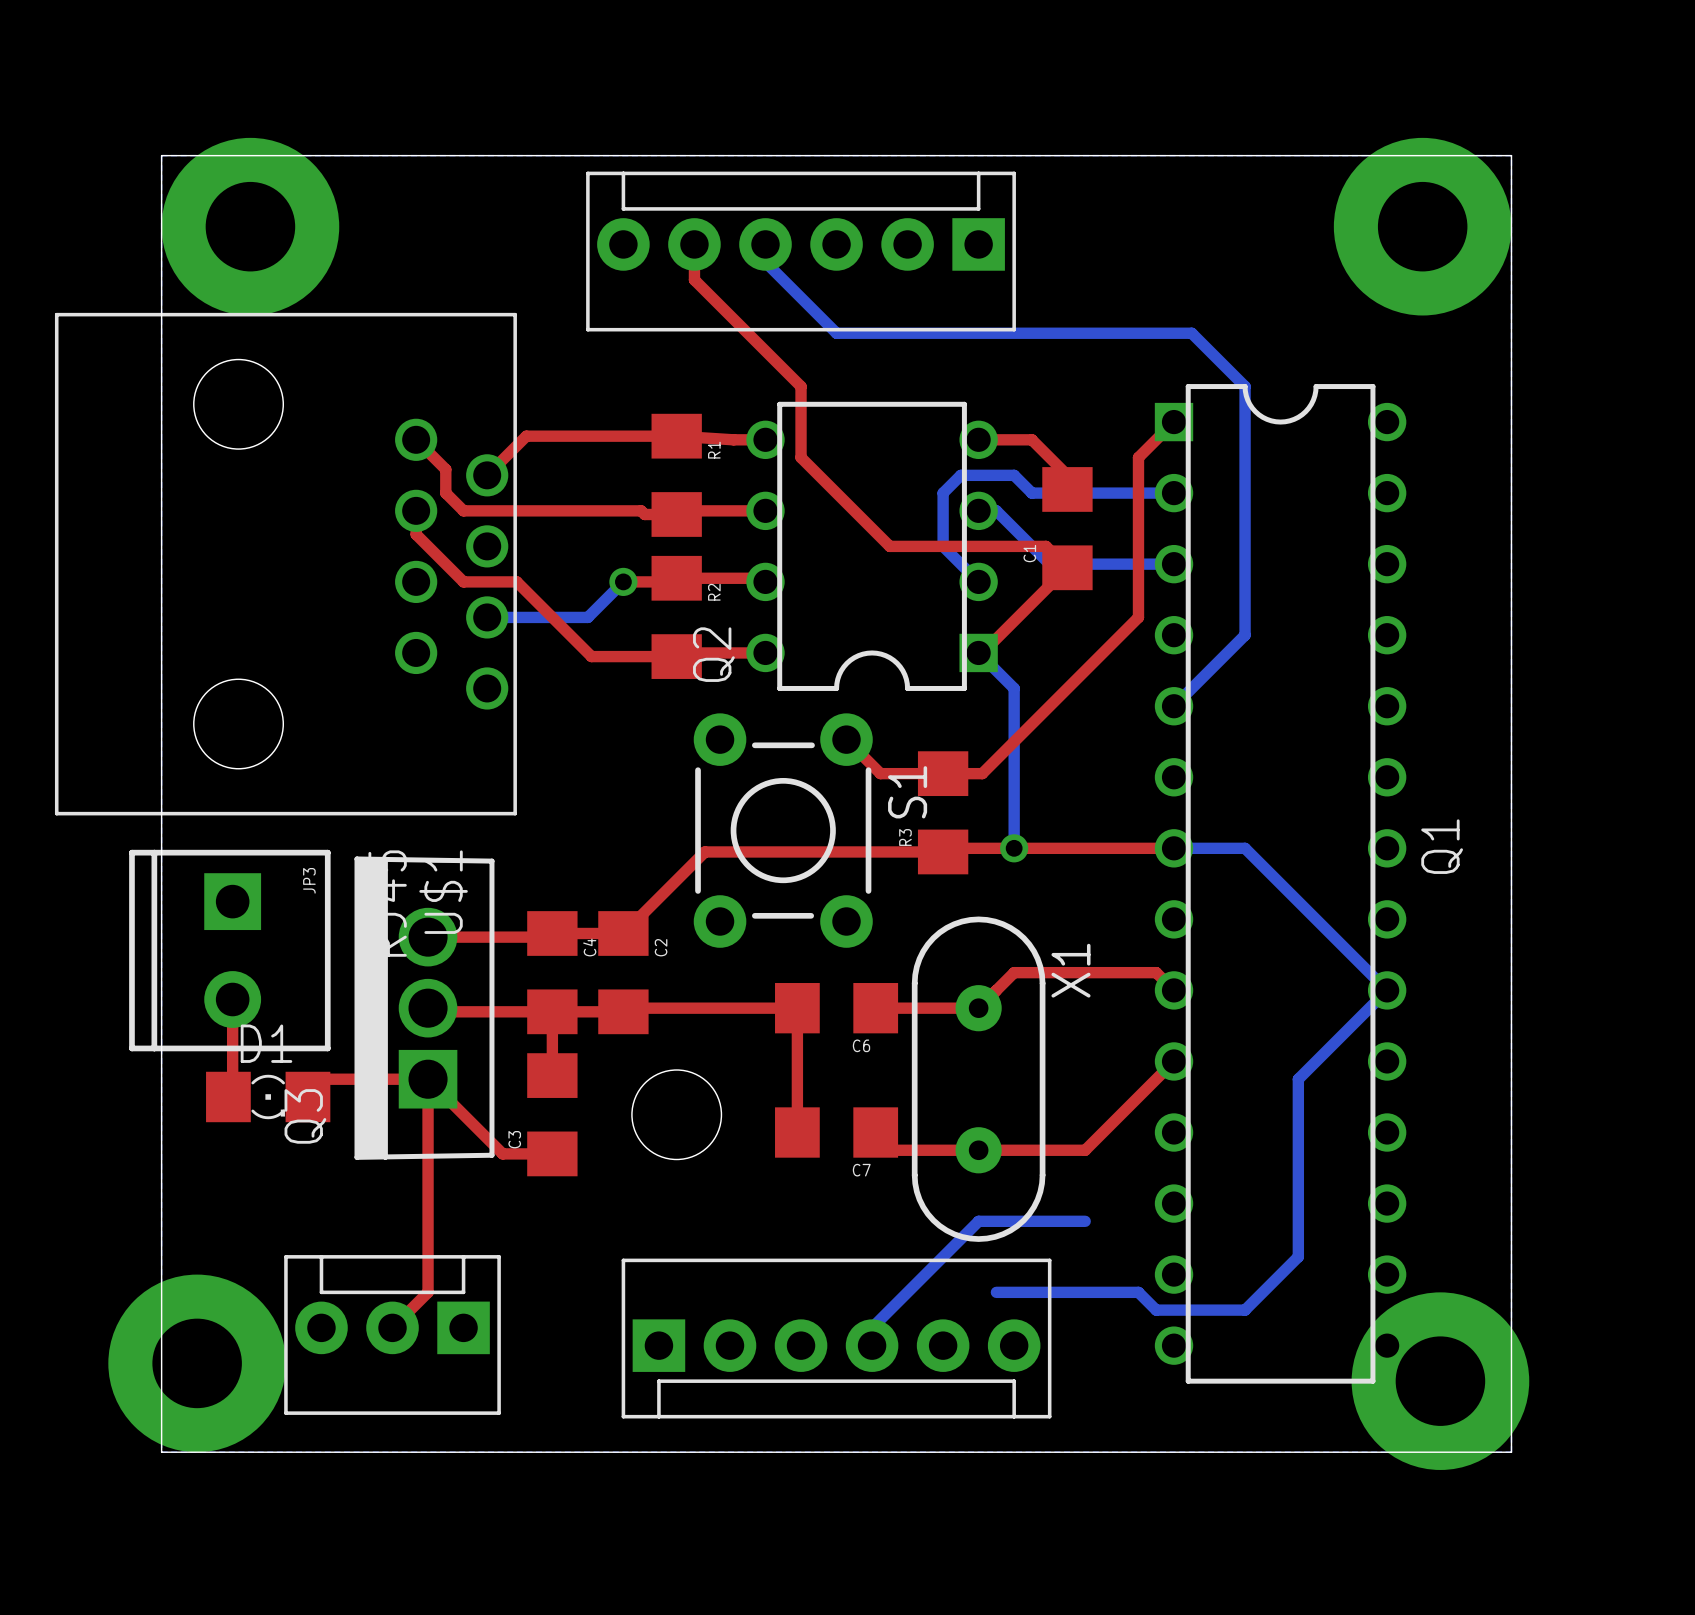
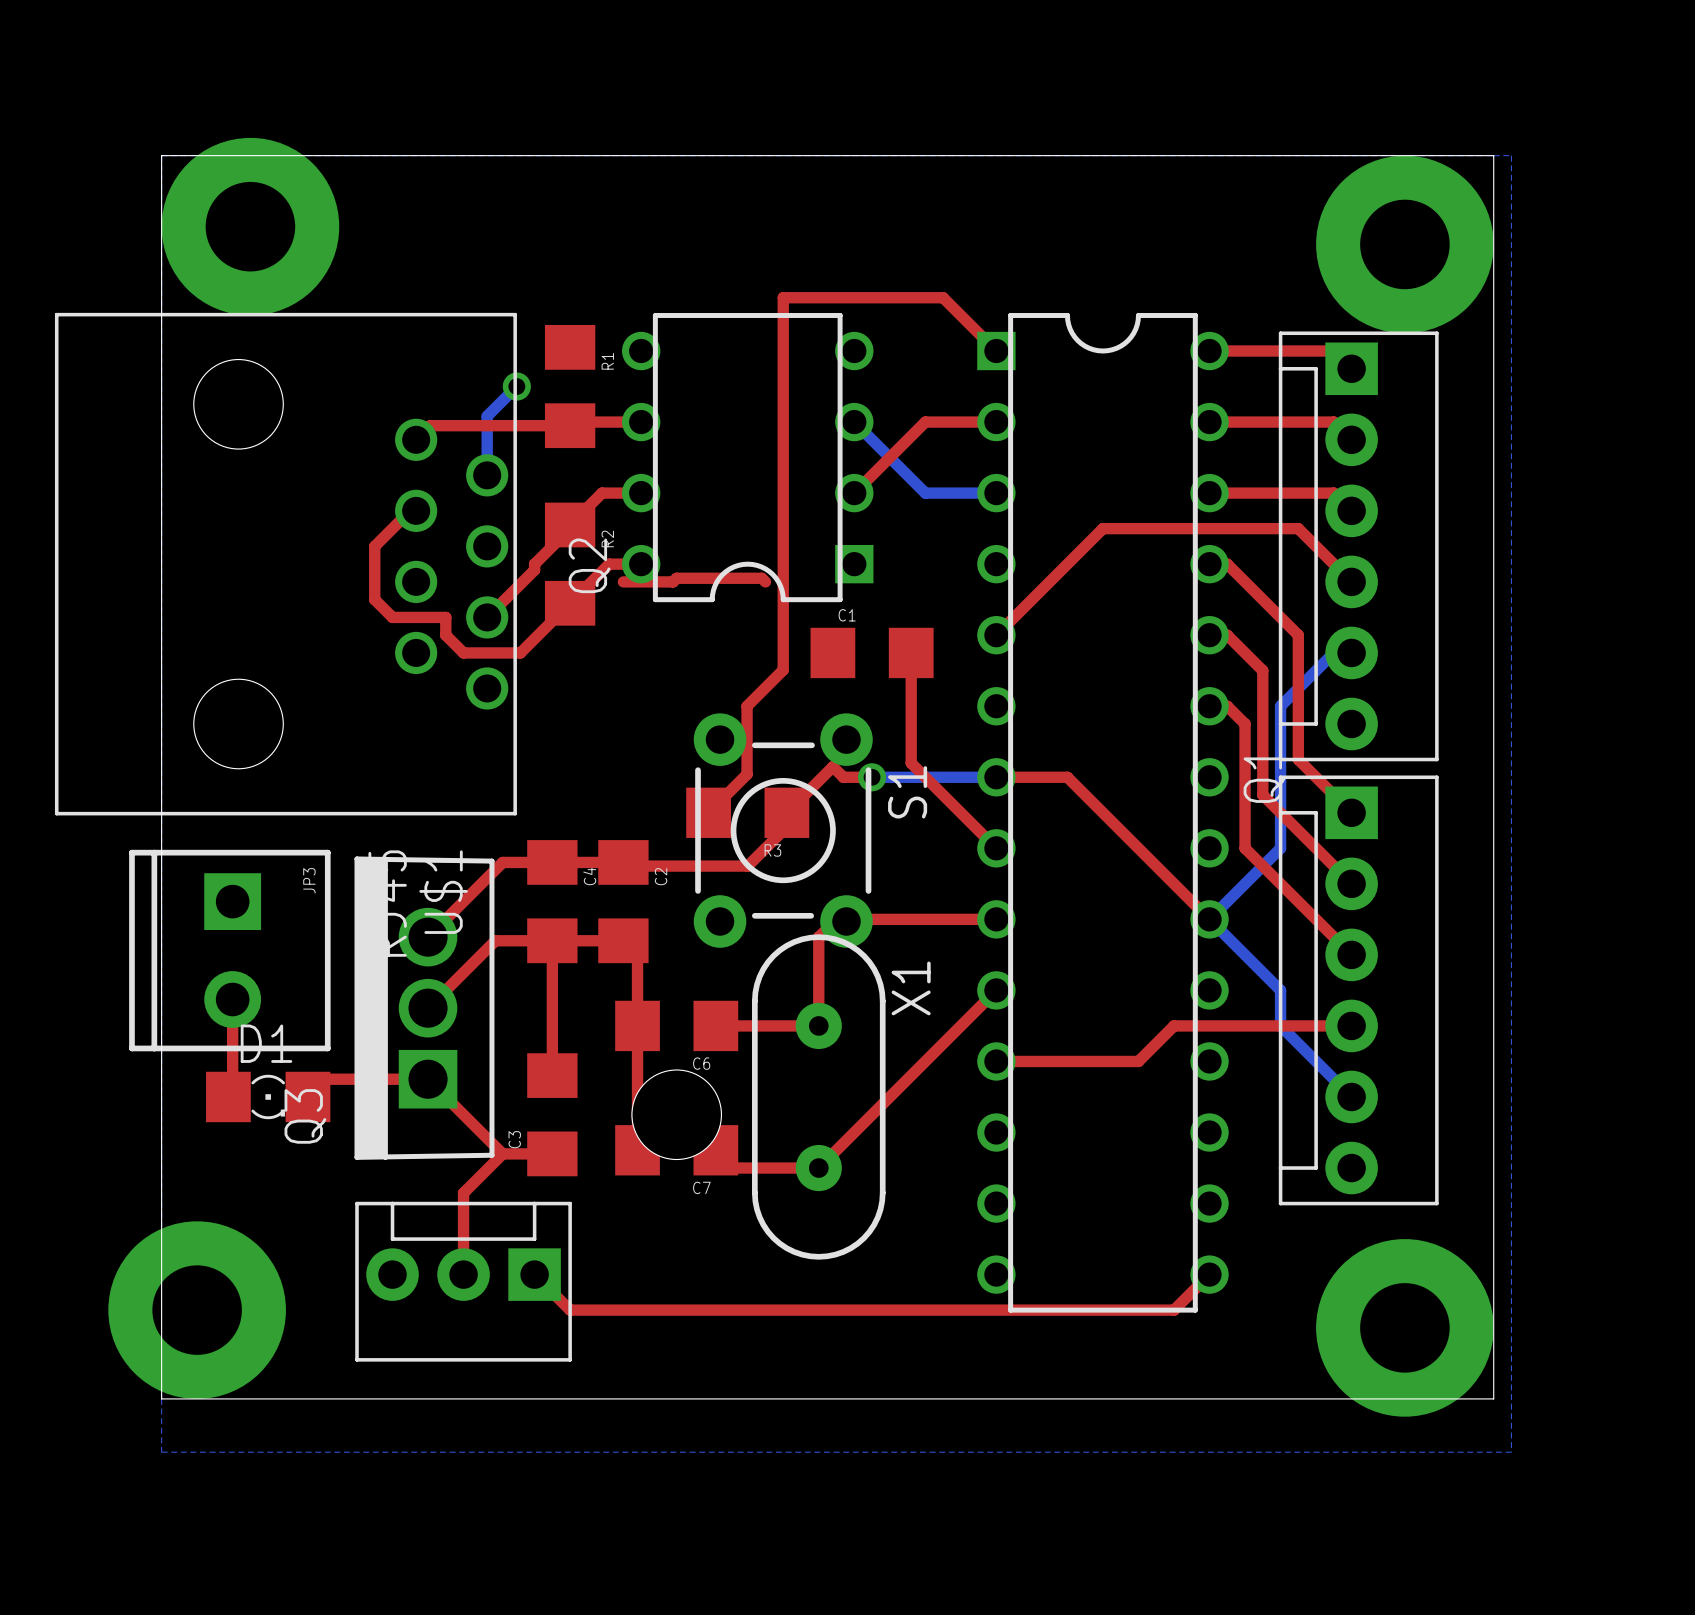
board edge: (1493, 155) (1511, 155) (1511, 1452) (161, 1452) (161, 1398) -> (1493, 155) (1493, 1398) (161, 1398)
part position: (1422, 226) -> (1404, 244)
top track: (694, 244) (694, 279) (801, 386) (801, 457) (889, 546) (1046, 546) (1067, 567) (982, 652) (978, 652) -> none
part: (801, 251) -> none
bottom track: (765, 262) (836, 333) (1191, 333) (1245, 386) (1245, 635) (1174, 706) -> none
top track: none -> (996, 351) (943, 297) (783, 297) (783, 670) (747, 706) (747, 774) (708, 812)
top track: none -> (1209, 351) (1333, 351) (1351, 368)
bottom track: none -> (516, 386) (487, 416) (487, 475)
via: none -> (516, 386)
bottom track: none -> (854, 422) (925, 493) (996, 493)
top track: none -> (996, 422) (925, 422) (854, 493)
top track: (1174, 422) (1138, 457) (1138, 617) (982, 773) (880, 773) (846, 739) -> none
top track: none -> (1209, 422) (1333, 422) (1351, 439)
top track: (416, 439) (445, 469) (445, 493) (463, 510) (641, 510) (644, 514) (676, 514) (680, 510) (765, 510) -> (416, 439) (430, 425) (570, 425) (573, 422) (641, 422)
top track: (765, 439) (676, 436) (526, 436) (487, 475) -> none
top track: (978, 439) (1031, 439) (1067, 475) (1067, 489) -> none
R1 position: (676, 475) -> (570, 386)
top track: none -> (641, 493) (602, 493) (534, 564) (534, 570) (487, 617)
bottom track: (1174, 493) (1031, 493) (1014, 475) (960, 475) (943, 493) (943, 546) (978, 581) -> none
top track: none -> (1209, 493) (1333, 493) (1351, 510)
top track: (416, 510) (416, 534) (463, 581) (516, 581) (591, 656) (676, 656) (680, 652) (765, 652) -> (416, 510) (410, 510) (374, 546) (374, 599) (392, 617) (445, 617) (445, 635) (463, 652) (520, 652) (609, 564) (641, 564)
bottom track: (978, 510) (996, 510) (1049, 564) (1174, 564) -> none
C1 rotation: 0° (1067, 528) -> 90° clockwise (872, 652)
C1 position: (1067, 528) -> (872, 652)
Q2 position: (872, 546) -> (747, 457)
part: none -> (1358, 546)
top track: none -> (1209, 564) (1227, 564) (1298, 635) (1298, 759) (1351, 812)
bottom track: (623, 581) (587, 617) (487, 617) -> none
via: (623, 581) -> none
top track: none -> (1351, 581) (1298, 528) (1102, 528) (996, 635)
R2 position: (676, 617) -> (570, 564)
top track: none -> (1209, 635) (1227, 635) (1262, 670) (1262, 795) (1351, 883)
top track: none -> (911, 652) (911, 763) (996, 848)
bottom track: (978, 652) (1014, 688) (1014, 848) -> none
bottom track: none -> (1351, 652) (1333, 652) (1280, 706) (1280, 848) (1209, 919) (1280, 990) (1280, 1025) (1351, 1096)
top track: none -> (1209, 706) (1227, 706) (1245, 724) (1245, 848) (1351, 954)
bottom track: none -> (872, 777) (996, 777)
via: none -> (872, 777)
top track: none -> (1014, 777) (1067, 777) (1209, 919)
R3 rotation: 0° (943, 812) -> 90° clockwise (747, 812)
R3 position: (943, 812) -> (747, 812)
R3 name position: R3 (905, 837) -> R3 (772, 850)
top track: (946, 848) (1174, 848) -> none
via: (1014, 848) -> none
bottom track: (1174, 848) (1245, 848) (1387, 990) (1298, 1079) (1298, 1256) (1245, 1310) (1156, 1310) (1138, 1292) (996, 1292) -> none
top track: (943, 851) (704, 851) (623, 933) (552, 933) (548, 937) (428, 937) -> (872, 777) (843, 777) (832, 766) (786, 812) (786, 826) (747, 866) (627, 866) (623, 862) (502, 862) (428, 937)
Q1 position: (1280, 883) -> (1102, 812)
top track: none -> (996, 919) (836, 919) (818, 937) (818, 1025) (715, 1025)
top track: none -> (552, 940) (552, 1011)
C4 position: (552, 972) -> (552, 901)
C2 position: (623, 972) -> (623, 901)
top track: (996, 990) (1014, 972) (1156, 972) (1174, 990) -> none
part: none -> (1358, 990)
top track: (428, 1008) (431, 1011) (623, 1011) (627, 1008) (797, 1008) -> (428, 1008) (495, 940) (623, 940) (637, 954) (637, 1150)
top track: (797, 1008) (797, 1132) -> none
C6 position: (836, 1008) -> (676, 1025)
top track: (875, 1008) (978, 1008) -> (715, 1150) (733, 1168) (818, 1168) (978, 1008)
top track: none -> (1351, 1025) (1174, 1025) (1138, 1061) (996, 1061)
top track: (1174, 1061) (1085, 1150) (893, 1150) (875, 1132) -> none
top track: (428, 1079) (428, 1292) (392, 1327) -> none
X1 position: (978, 1079) -> (818, 1096)
C7 position: (836, 1132) -> (676, 1150)
top track: none -> (502, 1153) (463, 1193) (463, 1274)
bottom track: (1085, 1221) (978, 1221) (872, 1327) (872, 1345) -> none
top track: none -> (534, 1274) (570, 1310) (1174, 1310) (1209, 1274)
part position: (392, 1334) -> (463, 1281)
part: (836, 1338) -> none
part position: (197, 1363) -> (197, 1310)
part position: (1440, 1381) -> (1404, 1327)

